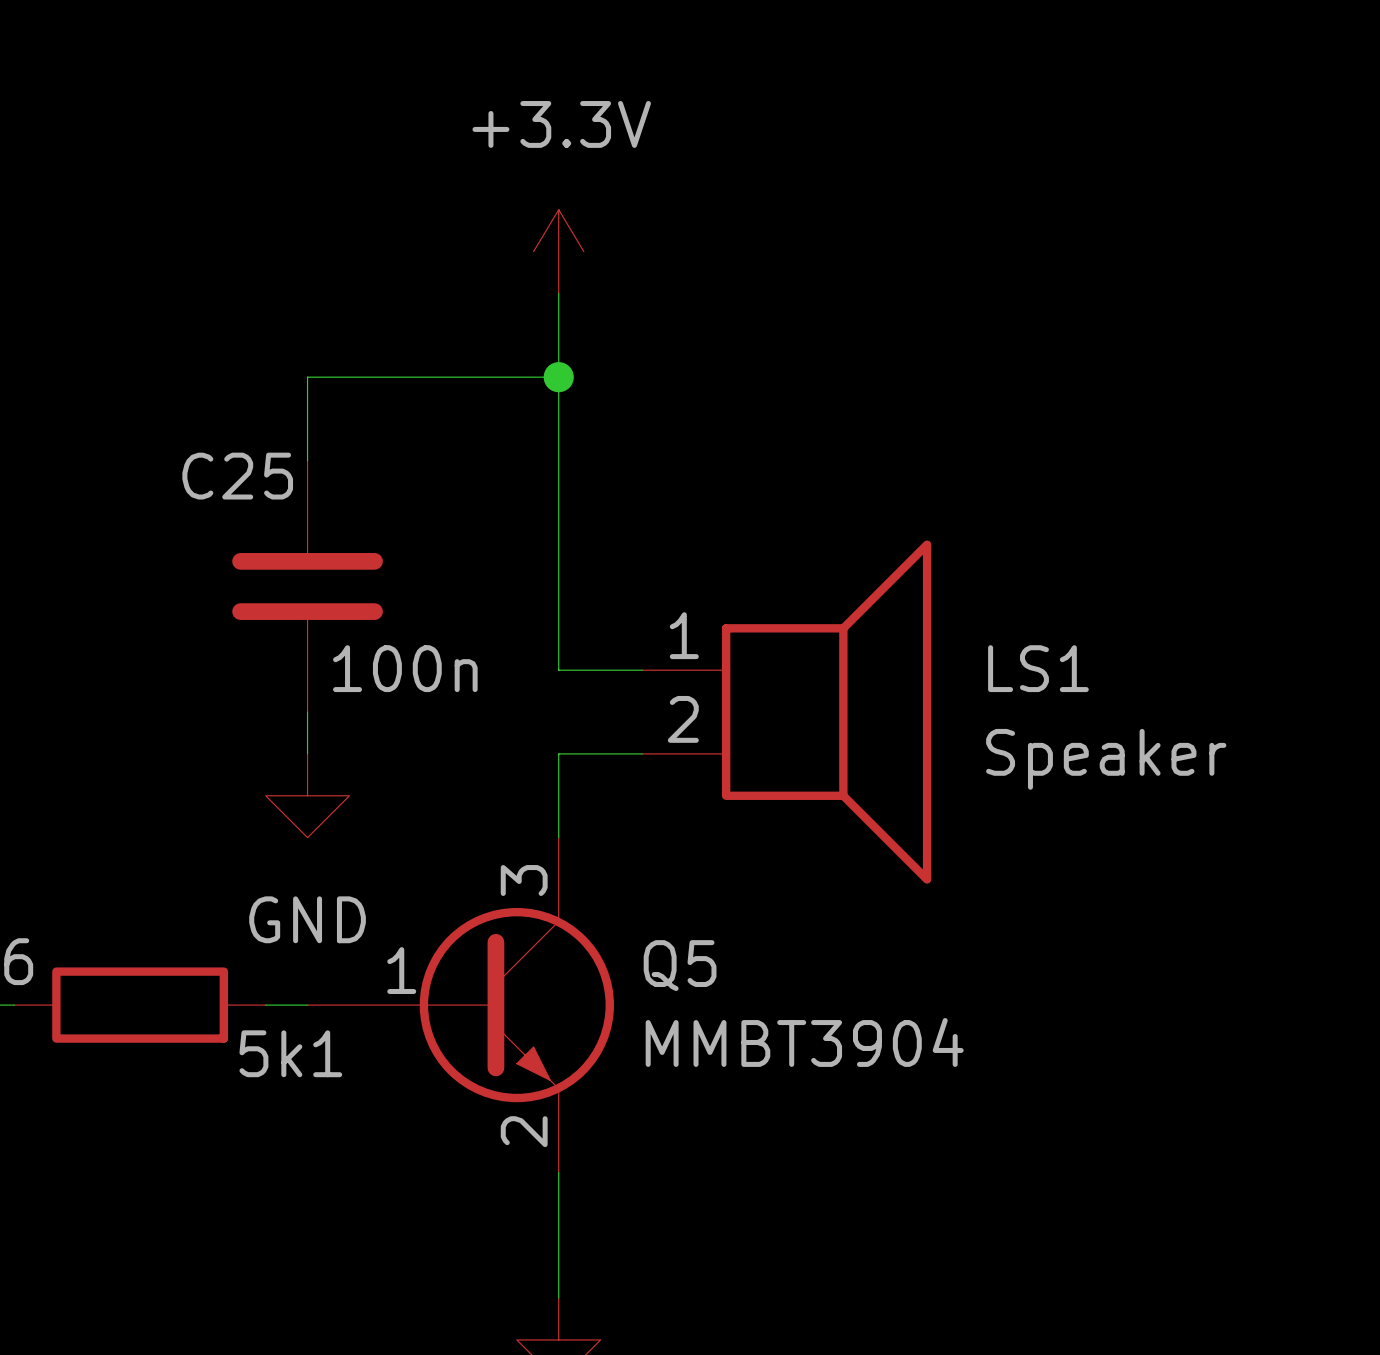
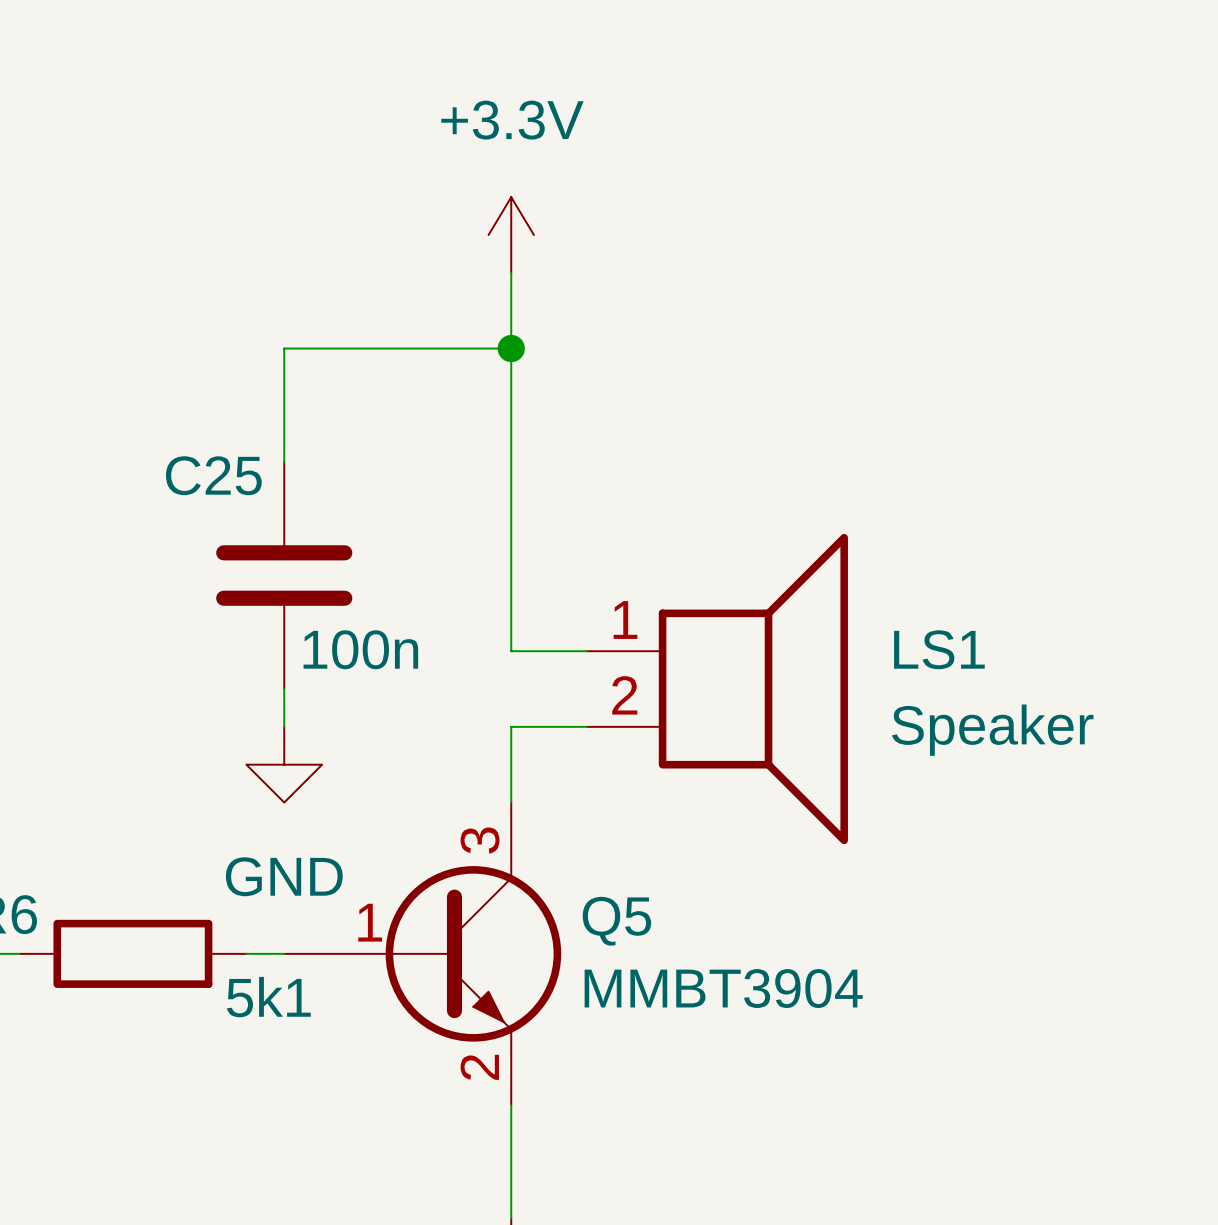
power symbol position: +3.3V (558, 251) -> +3.3V (511, 235)
wire: (307, 377) (558, 377) -> (284, 386) (284, 348) (511, 348)
junction position: (558, 377) -> (511, 348)

